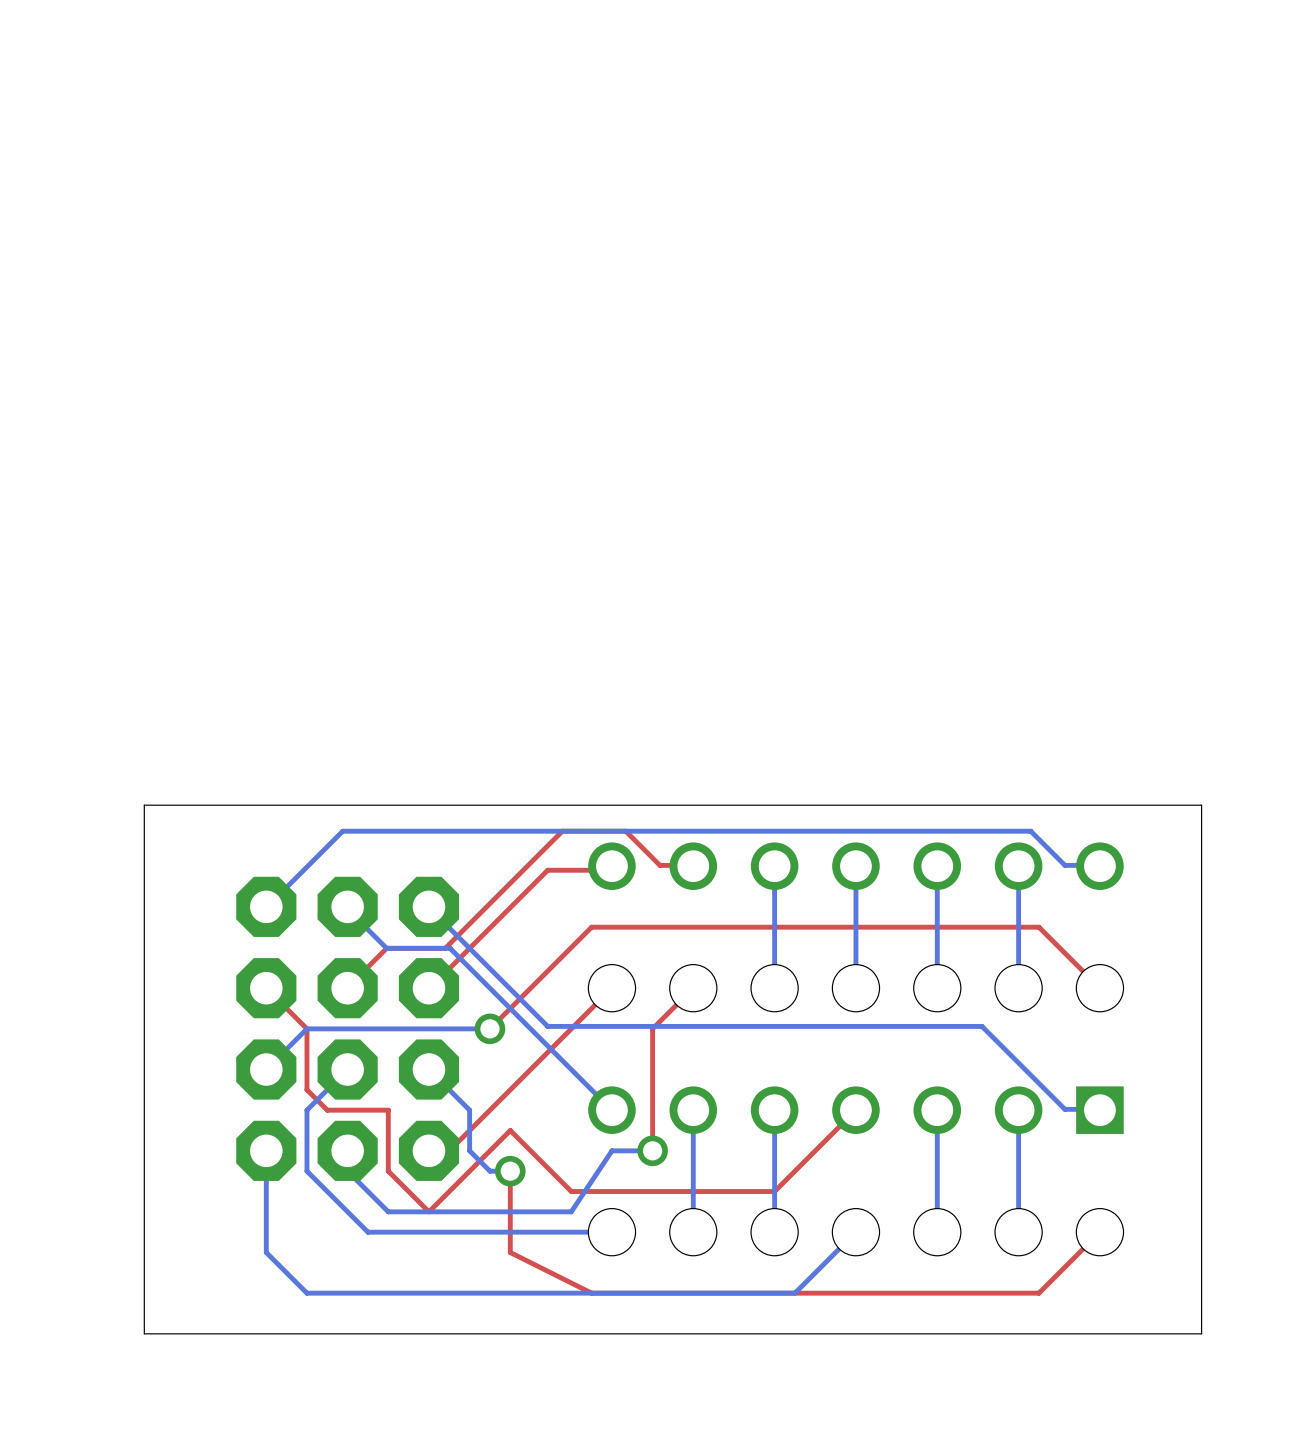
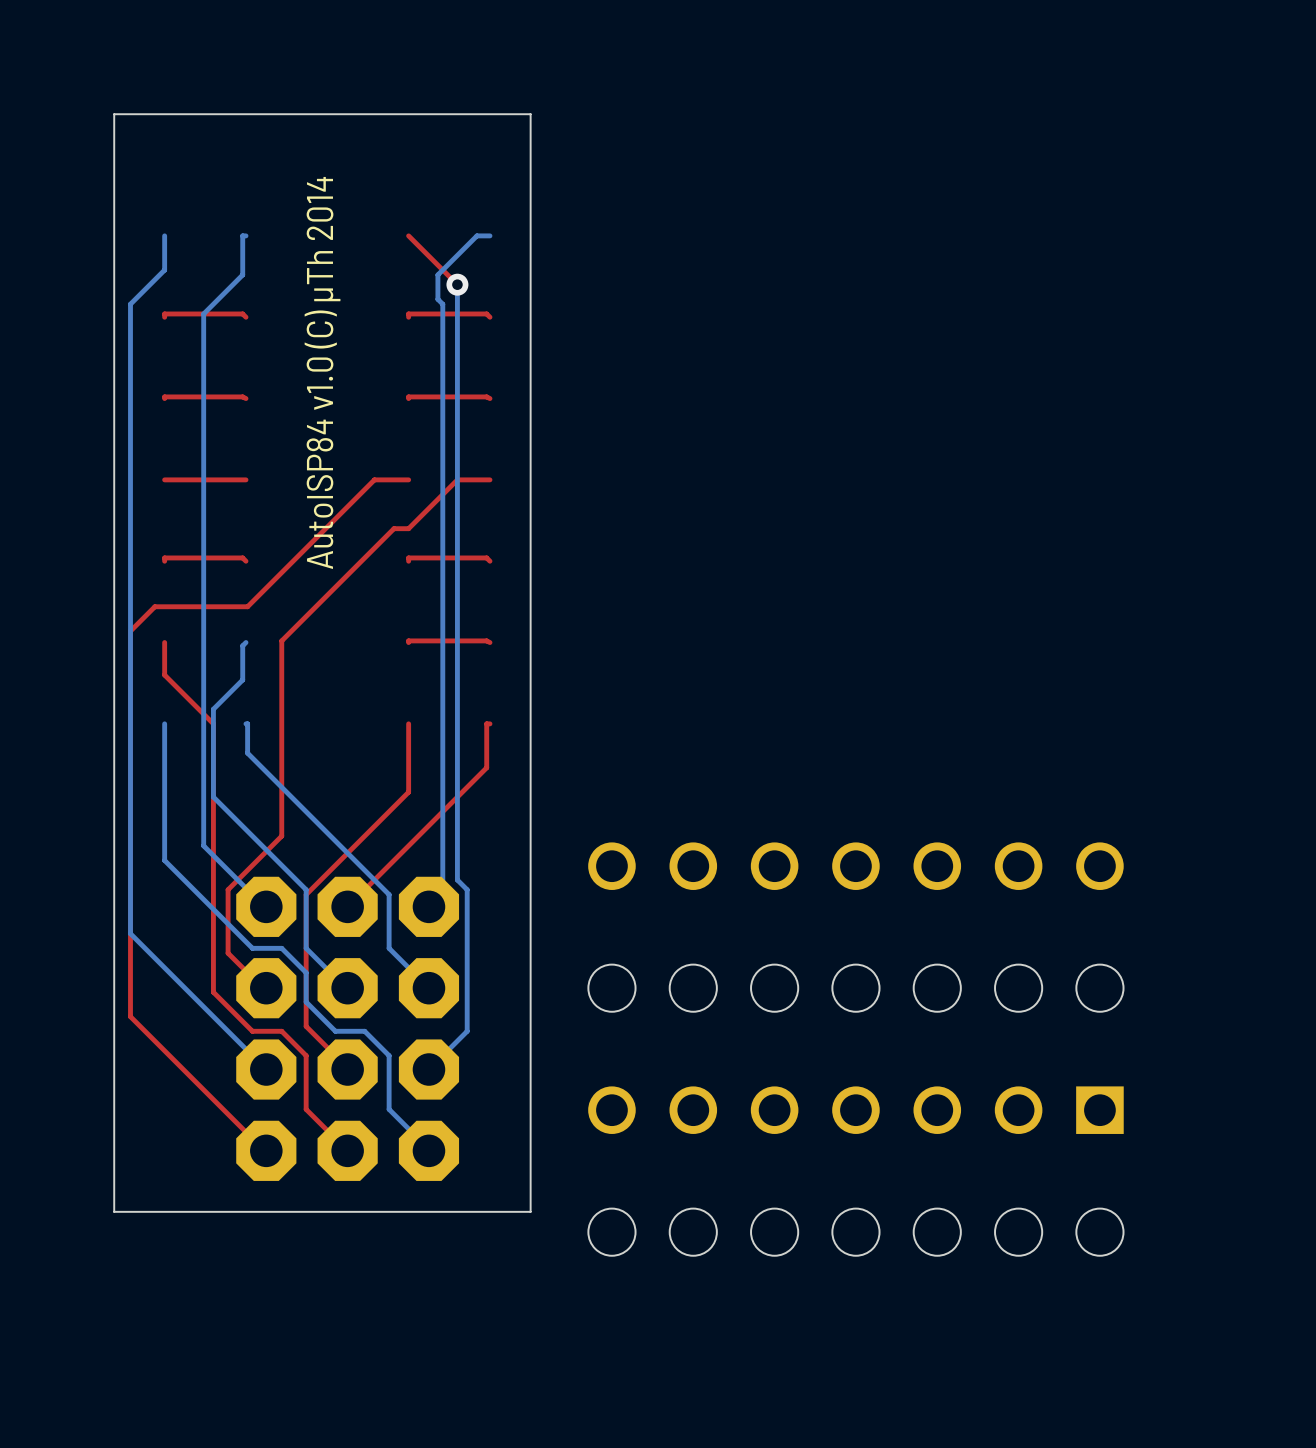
board edge: none -> (530, 114) (114, 114) (114, 1211) (530, 1211) (530, 114)
top track: none -> (408, 235) (457, 284)
via: none -> (457, 284)
top track: none -> (245, 317) (242, 313) (164, 313) (164, 317)
top track: none -> (489, 317) (486, 313) (408, 313) (408, 317)
top track: none -> (245, 398) (242, 396) (164, 396) (164, 398)
top track: none -> (489, 398) (486, 396) (408, 396) (408, 398)
text: none -> AutoISP84 v1.0 (C) µTh 2014 (322, 372)
top track: none -> (245, 479) (164, 479)
top track: none -> (408, 479) (374, 479) (247, 606) (154, 606) (130, 631) (130, 1016) (266, 1150)
top track: none -> (245, 561) (242, 557) (164, 557) (164, 561)
top track: none -> (489, 561) (486, 557) (408, 557) (408, 561)
top track: none -> (164, 642) (164, 675) (213, 723) (213, 992) (252, 1031) (281, 1031) (306, 1055) (306, 1109) (347, 1150)
bottom track: none -> (245, 642) (242, 645) (242, 679) (213, 709) (213, 797) (306, 889) (306, 948) (347, 988)
top track: none -> (489, 642) (486, 640) (408, 640) (408, 642)
bottom track: none -> (164, 723) (164, 860) (252, 948) (281, 948) (306, 972) (306, 1002) (335, 1031) (364, 1031) (389, 1055) (389, 1109) (428, 1150)
bottom track: none -> (245, 723) (247, 723) (247, 753) (389, 894) (389, 948) (428, 988)
top track: none -> (408, 723) (408, 792) (306, 894) (306, 1026) (347, 1069)
top track: none -> (489, 723) (486, 723) (486, 767) (347, 906)
board edge: (1201, 805) (144, 805) (144, 1333) (1201, 1333) (1201, 805) -> none
top track: (611, 866) (611, 870) (547, 870) (428, 988) -> none
top track: (693, 866) (659, 865) (625, 831) (562, 831) (445, 948) (386, 948) (347, 988) -> none
bottom track: (774, 866) (774, 988) -> none
bottom track: (855, 866) (855, 988) -> none
bottom track: (937, 866) (937, 988) -> none
bottom track: (1018, 866) (1018, 988) -> none
bottom track: (1099, 866) (1064, 865) (1030, 831) (342, 831) (266, 906) -> (245, 235) (242, 235) (242, 274) (203, 313) (203, 845) (266, 906)
bottom track: (347, 906) (347, 909) (386, 948) (450, 948) (611, 1110) -> none
bottom track: (428, 906) (547, 1026) (982, 1026) (1064, 1109) (1099, 1110) -> (428, 906) (442, 894) (442, 304) (437, 299) (437, 274) (476, 235) (489, 235)
top track: (266, 988) (306, 1028) (306, 1089) (327, 1110) (388, 1110) (388, 1171) (428, 1211) (510, 1130) (571, 1191) (774, 1191) (855, 1110) -> (266, 988) (262, 987) (228, 953) (228, 889) (281, 836) (281, 640) (394, 528) (408, 528) (457, 479) (489, 479)
top track: (611, 988) (449, 1150) (428, 1150) -> none
top track: (693, 988) (652, 1028) (652, 1150) -> none
top track: (1099, 988) (1038, 927) (591, 927) (489, 1028) -> none
bottom track: (489, 1028) (306, 1028) (266, 1069) -> (164, 235) (164, 270) (130, 304) (130, 933) (266, 1069)
via: (489, 1028) -> none
bottom track: (347, 1069) (306, 1110) (306, 1171) (367, 1232) (611, 1232) -> none
bottom track: (428, 1069) (469, 1110) (469, 1150) (489, 1171) (510, 1171) -> (428, 1069) (467, 1031) (467, 889) (457, 880) (457, 284)
bottom track: (693, 1110) (693, 1232) -> none
bottom track: (774, 1110) (774, 1232) -> none
bottom track: (937, 1110) (937, 1232) -> none
bottom track: (1018, 1110) (1018, 1232) -> none
bottom track: (266, 1150) (266, 1252) (306, 1293) (794, 1293) (855, 1232) -> none
bottom track: (652, 1150) (611, 1150) (571, 1211) (388, 1211) (347, 1171) (347, 1150) -> none
via: (652, 1150) -> none
top track: (510, 1171) (510, 1252) (591, 1293) (1038, 1293) (1099, 1232) -> none
via: (510, 1171) -> none

